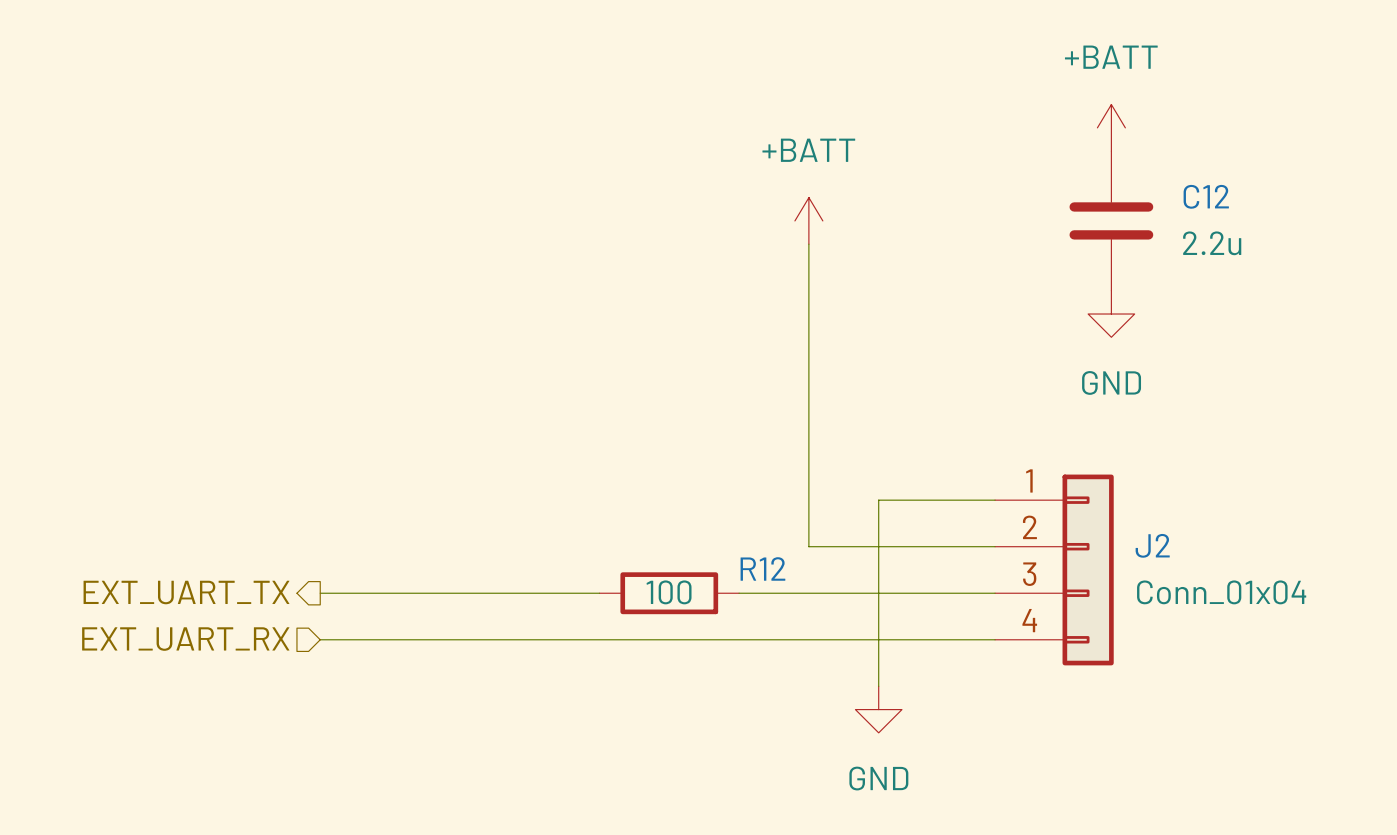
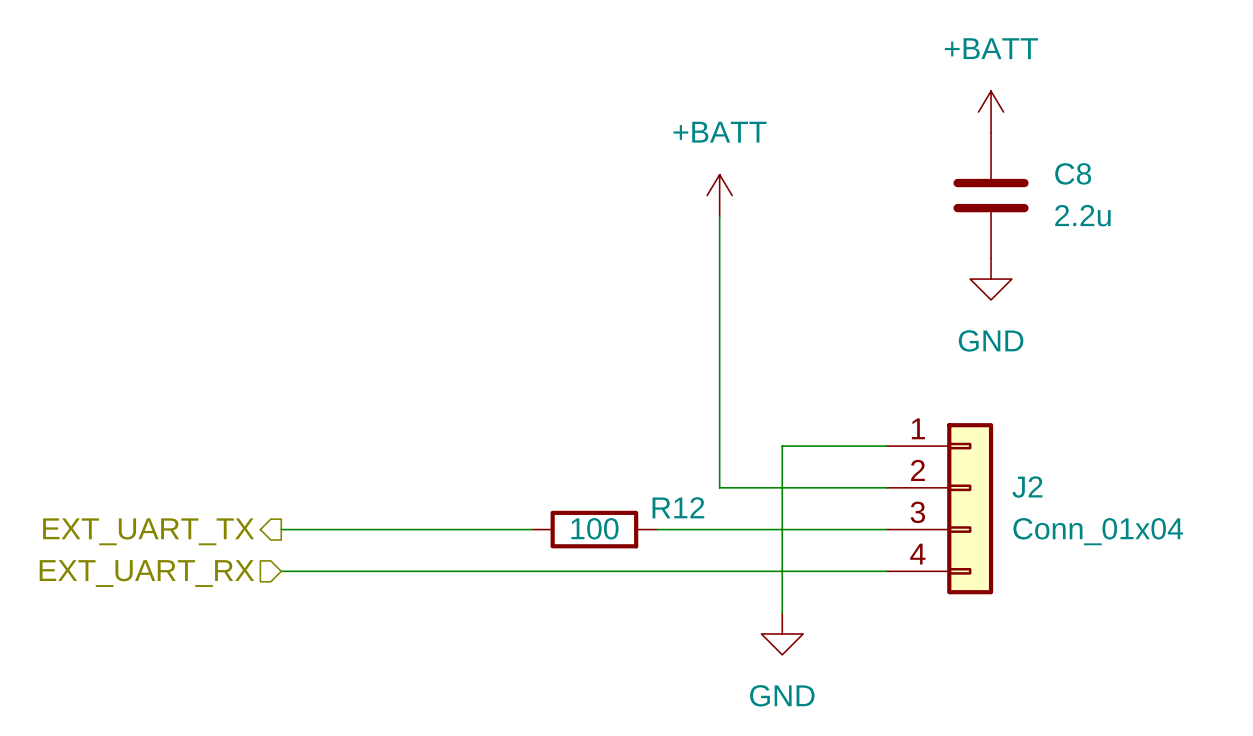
C12 name: C12 (1206, 196) -> C8 (1073, 173)

